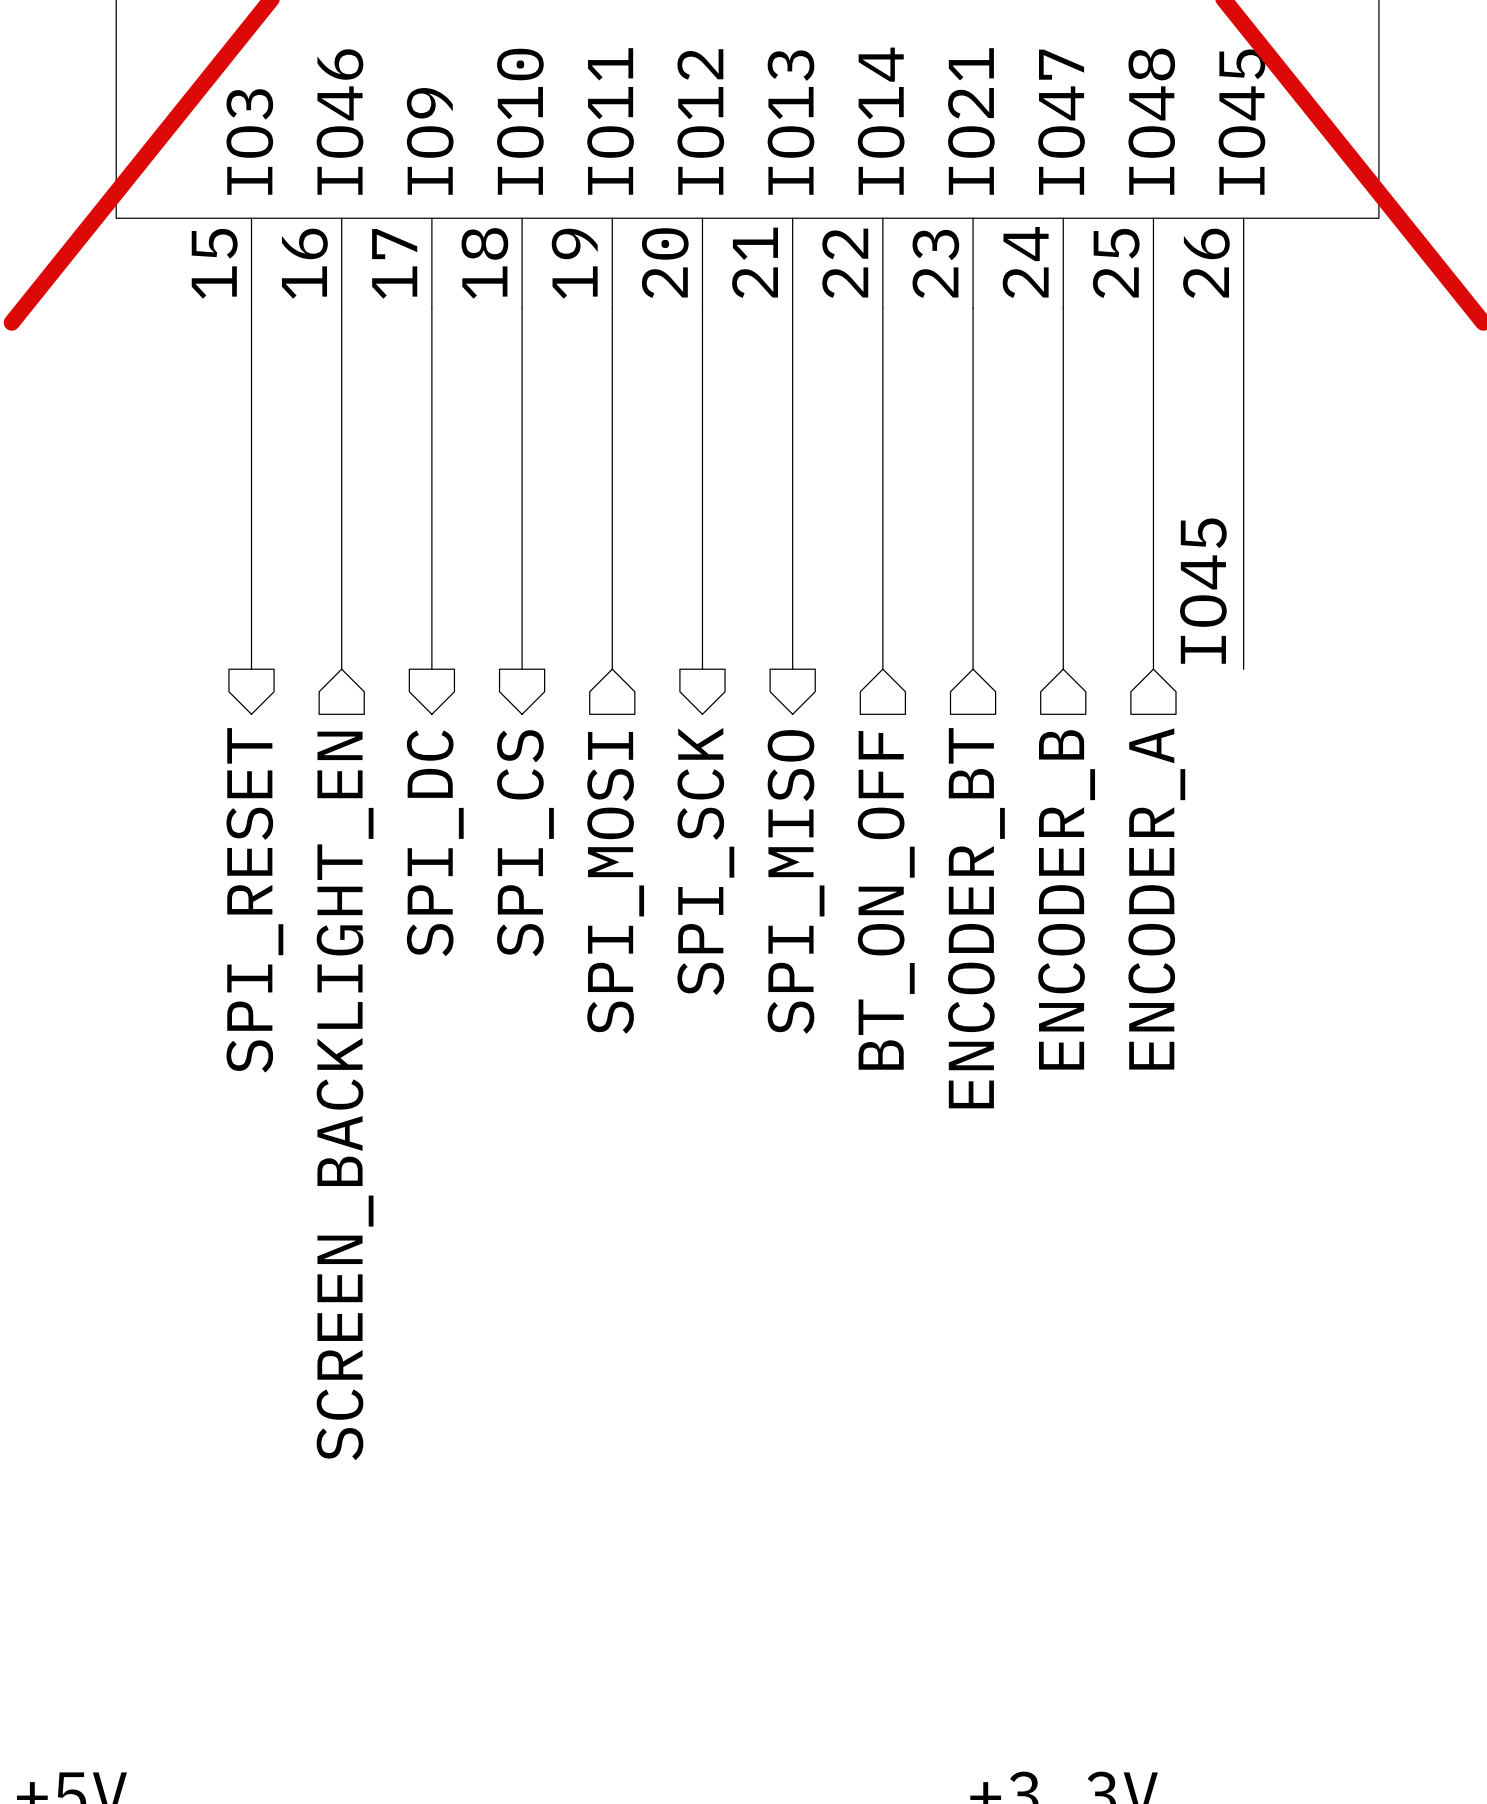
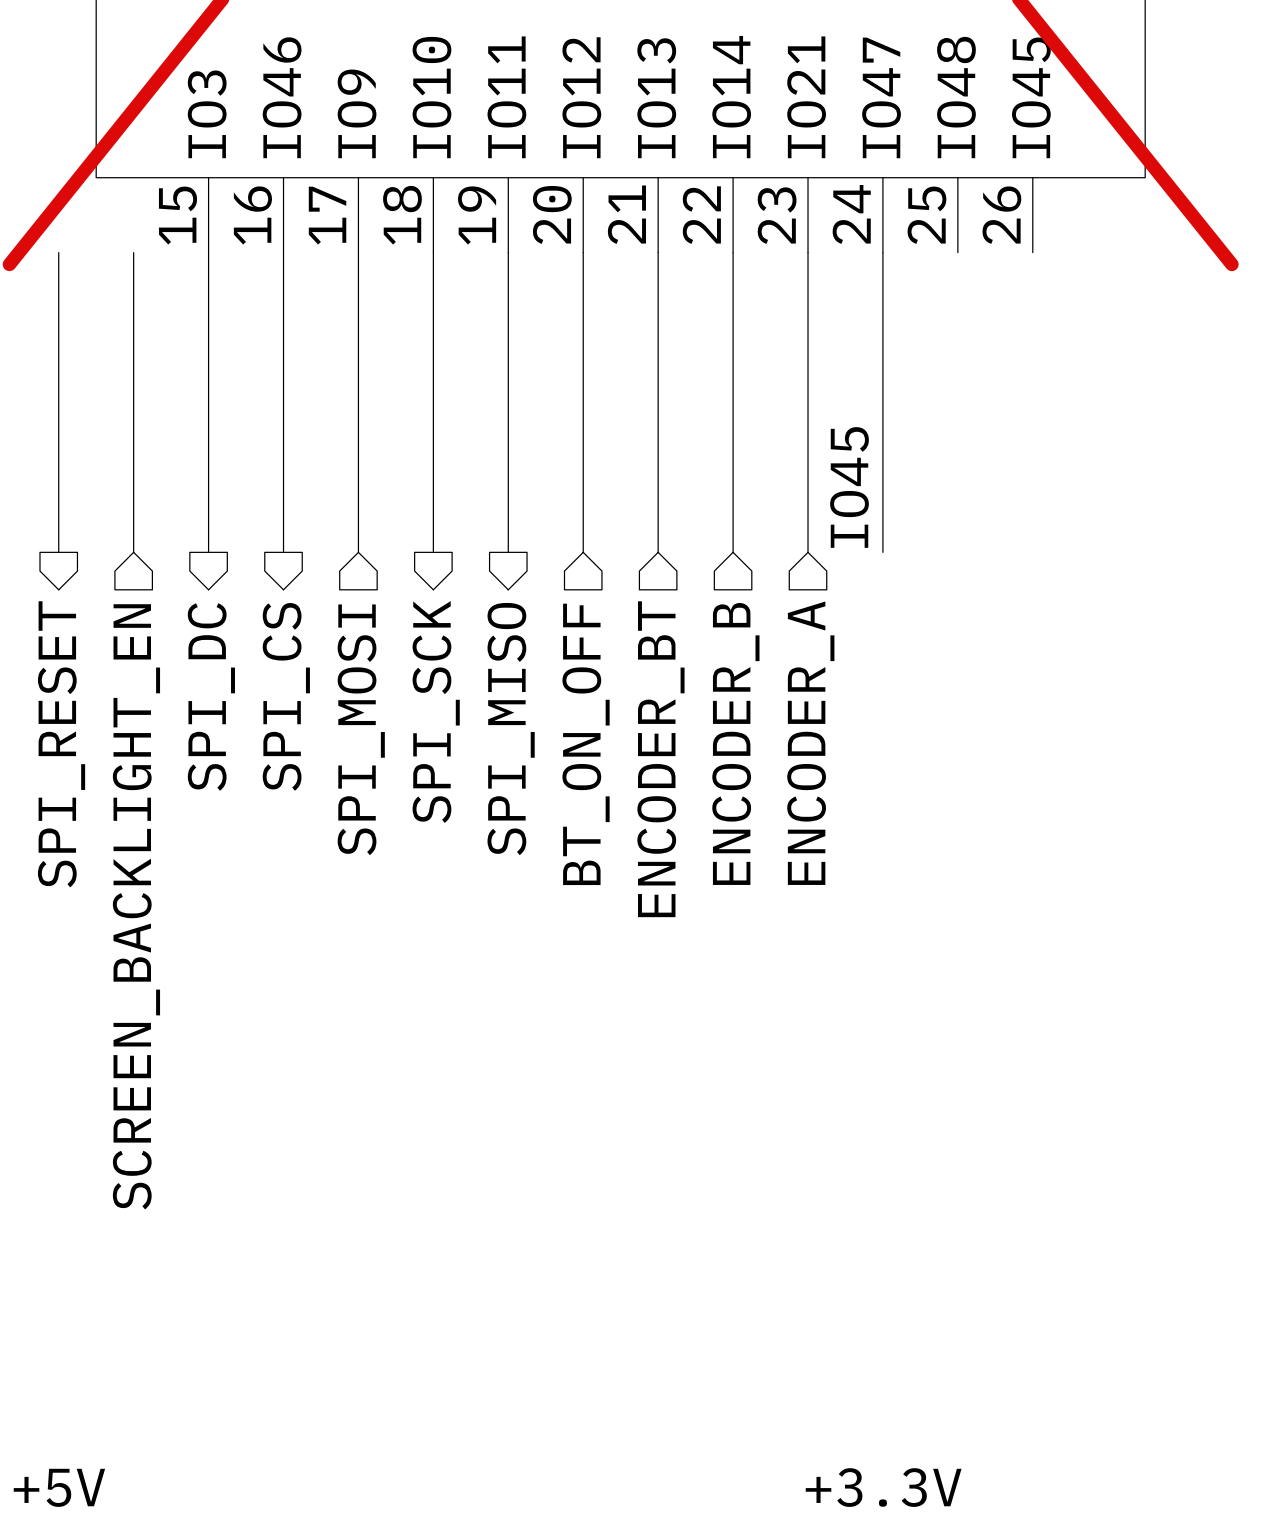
wire: none -> (58, 252) (58, 552)
wire: none -> (133, 252) (133, 552)
wire: (1153, 308) (1153, 669) -> none
wire: (1243, 308) (1243, 669) -> none
label position: IO45 (1203, 591) -> IO45 (849, 487)
hierarchical label shape: output (435, 843) -> input (361, 729)
hierarchical label: SPI_DC (435, 843) -> SPI_MOSI (361, 729)
hierarchical label: SPI_CS (525, 843) -> SPI_SCK (436, 712)
hierarchical label shape: output (705, 861) -> input (586, 744)
hierarchical label: SPI_SCK (705, 861) -> BT_ON_OFF (586, 744)
hierarchical label shape: output (796, 881) -> input (660, 759)
hierarchical label: SPI_MISO (796, 881) -> ENCODER_BT (660, 759)
hierarchical label shape: input (615, 882) -> output (511, 729)
hierarchical label: SPI_MOSI (615, 882) -> SPI_MISO (511, 729)
hierarchical label: ENCODER_B (1066, 899) -> none
hierarchical label: ENCODER_A (1156, 899) -> none
hierarchical label: none -> SPI_RESET (61, 744)
hierarchical label: SPI_RESET (254, 900) -> SPI_DC (211, 697)
hierarchical label: BT_ON_OFF (886, 900) -> ENCODER_B (735, 743)
hierarchical label: ENCODER_BT (976, 918) -> ENCODER_A (810, 743)
hierarchical label: none -> SCREEN_BACKLIGHT_EN (136, 906)
hierarchical label shape: input (345, 1095) -> output (286, 696)
hierarchical label: SCREEN_BACKLIGHT_EN (345, 1095) -> SPI_CS (286, 696)

